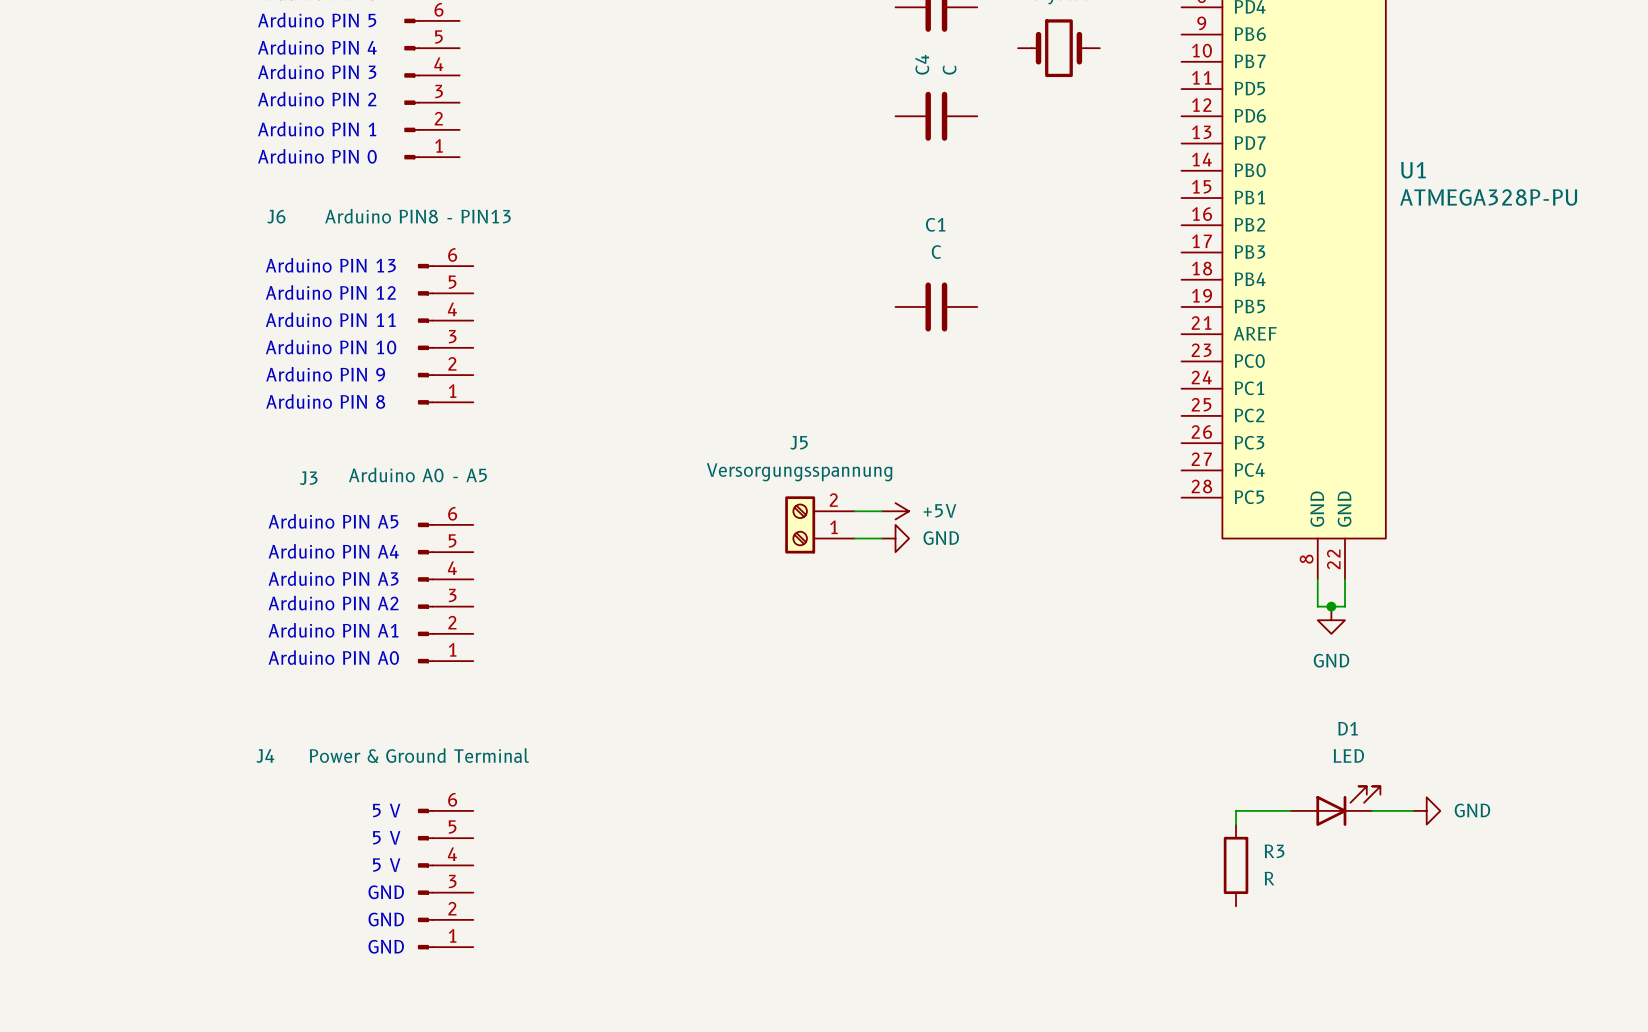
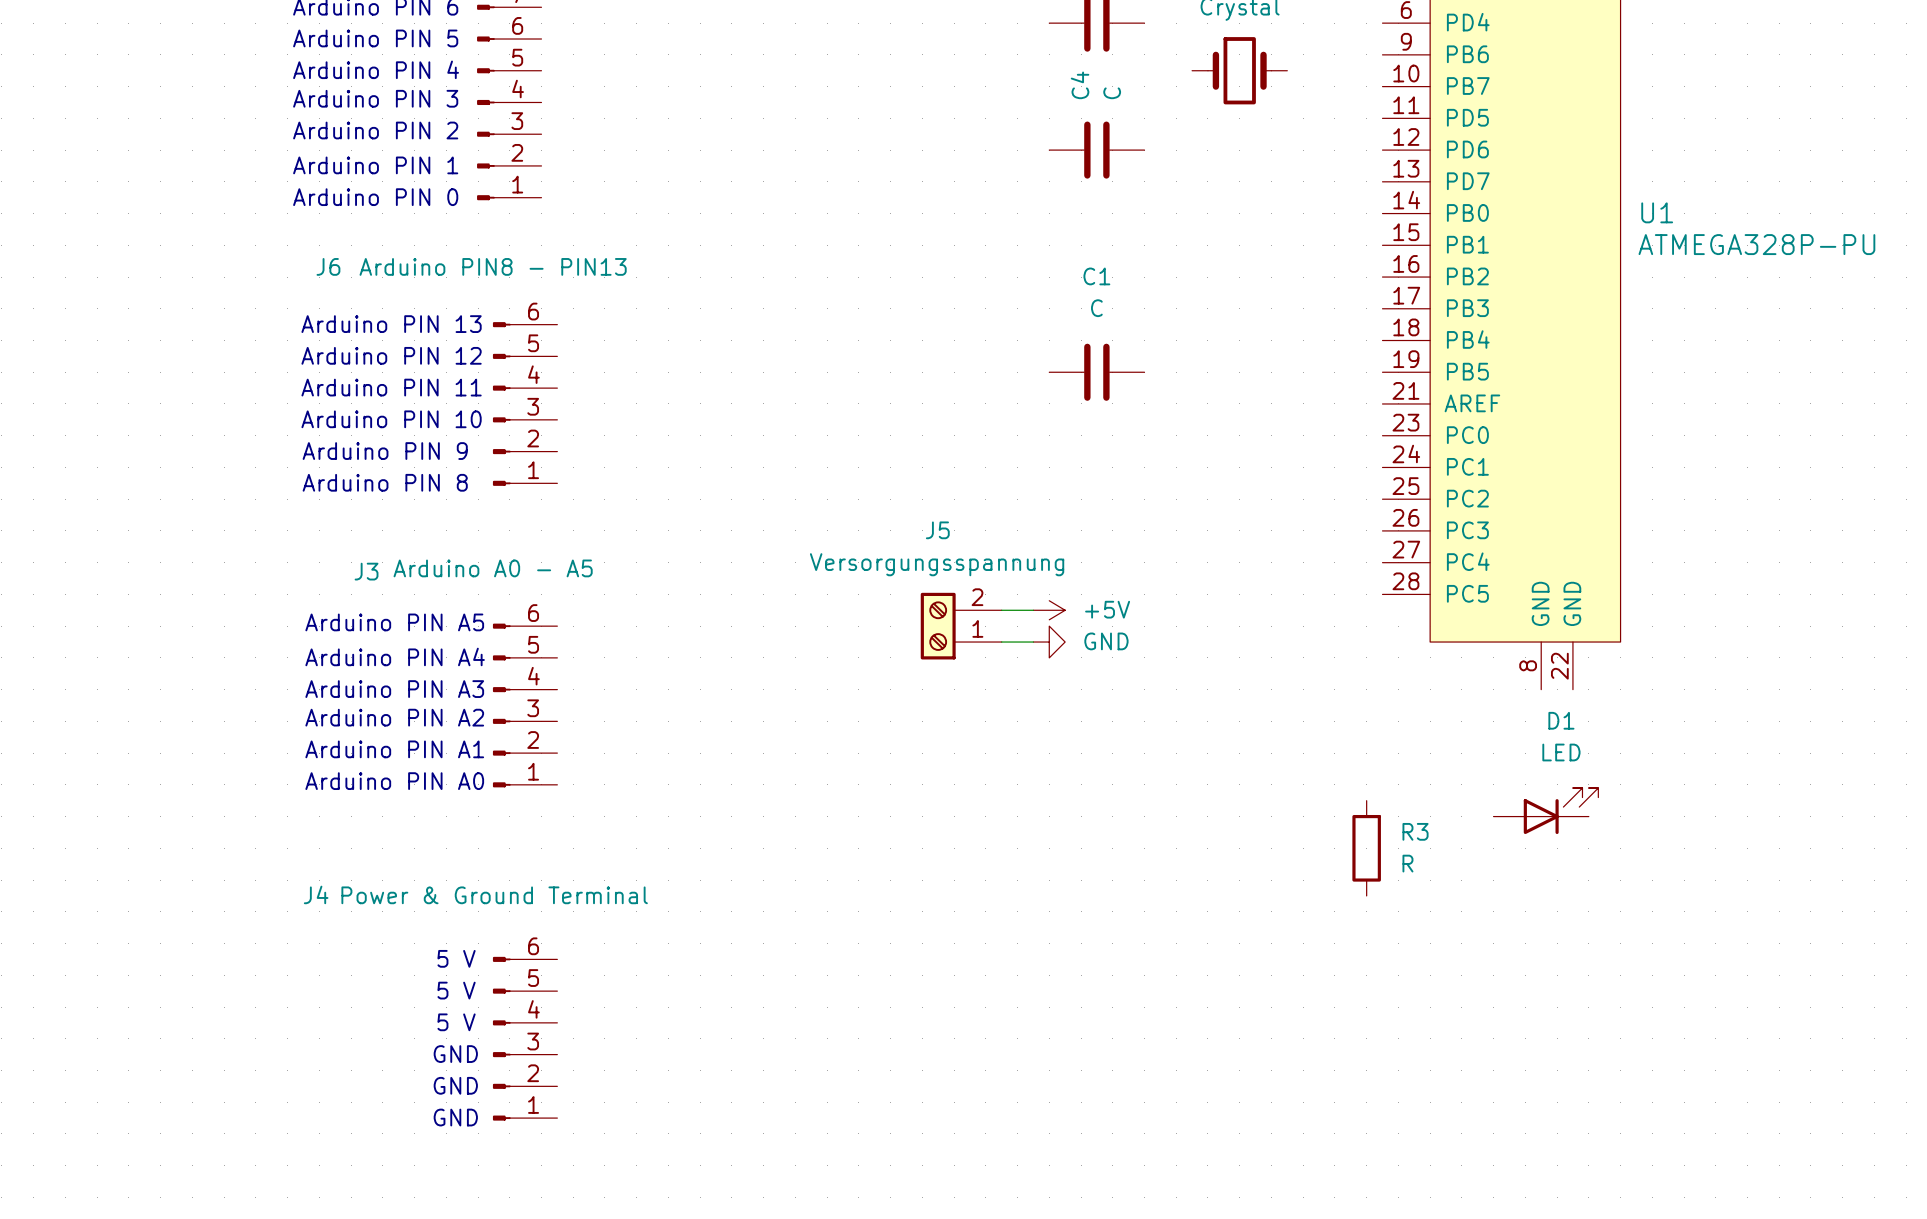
wire: (1317, 579) (1317, 606) (1344, 606) (1344, 579) -> none
junction: (1331, 606) -> none
power symbol: GND (1331, 620) -> none
D1 position: (1335, 806) -> (1545, 811)
wire: (1290, 810) (1236, 810) (1236, 824) -> none
wire: (1372, 810) (1413, 810) -> none
power symbol: GND (1426, 810) -> none
R3 position: (1236, 865) -> (1366, 848)

